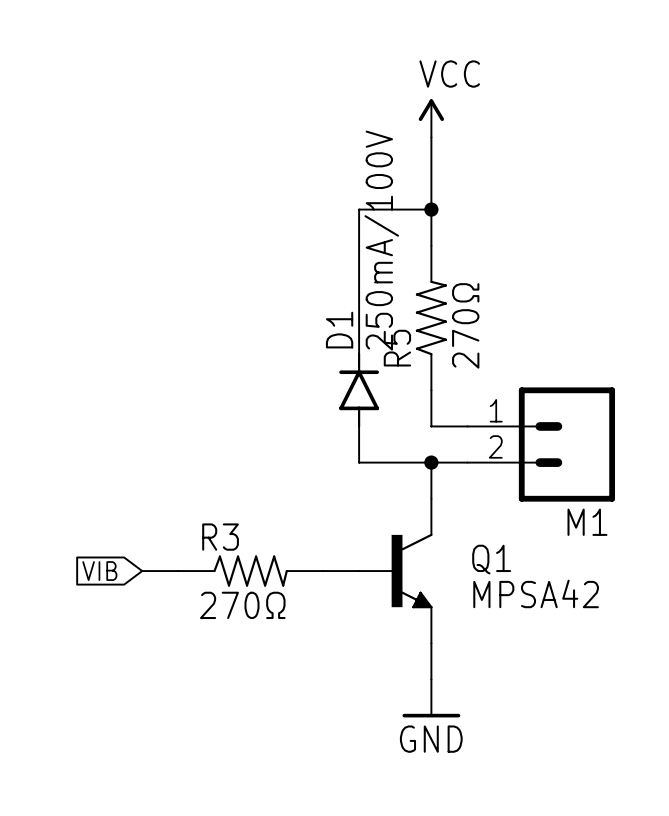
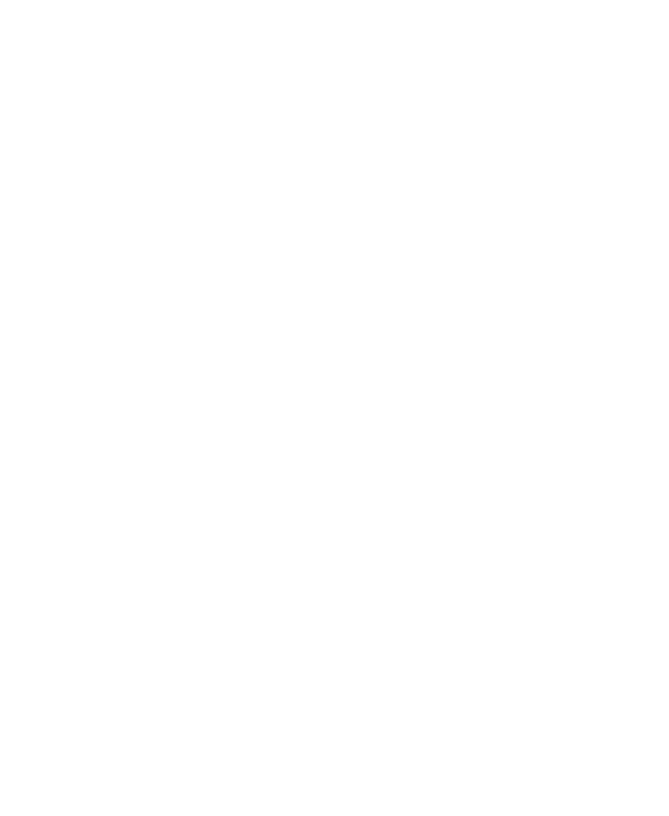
power symbol: VCC (431, 118) -> none
wire: (431, 137) (431, 245) -> none
wire: (431, 209) (359, 209) (359, 354) -> none
junction: (431, 209) -> none
R5: 270Ω (431, 318) -> none
D1: 250mA/100V (359, 390) -> none
wire: (431, 390) (431, 426) (467, 426) -> none
wire: (359, 426) (359, 462) (467, 462) -> none
M1: (541, 444) -> none
wire: (431, 462) (431, 498) -> none
junction: (431, 462) -> none
global label: VIB (99, 571) -> none
wire: (142, 571) (178, 571) -> none
R3: 270Ω (250, 571) -> none
wire: (322, 571) (359, 571) -> none
Q1: MPSA42 (395, 571) -> none
wire: (431, 643) (431, 679) -> none
power symbol: GND (431, 698) -> none

